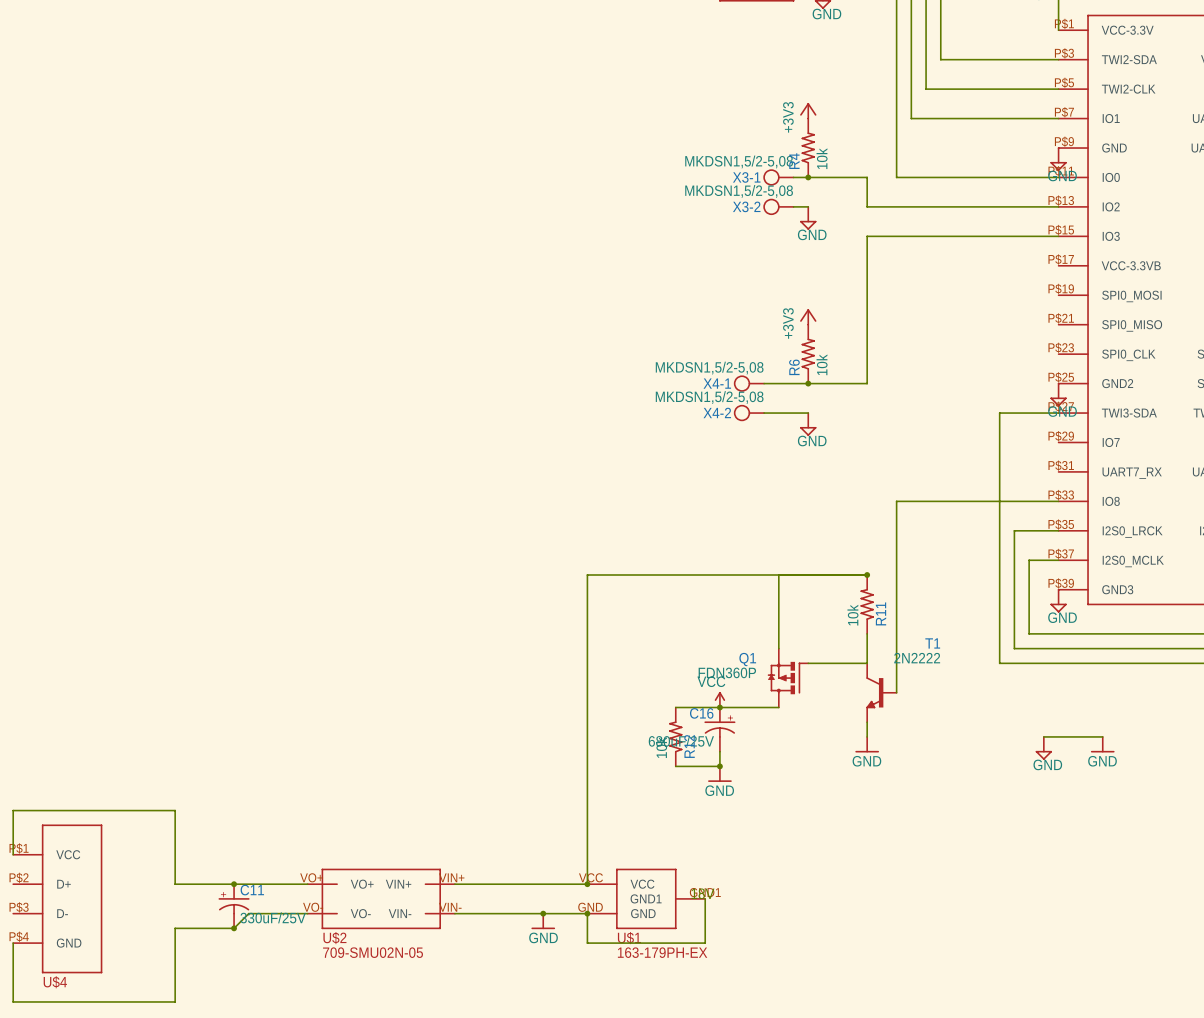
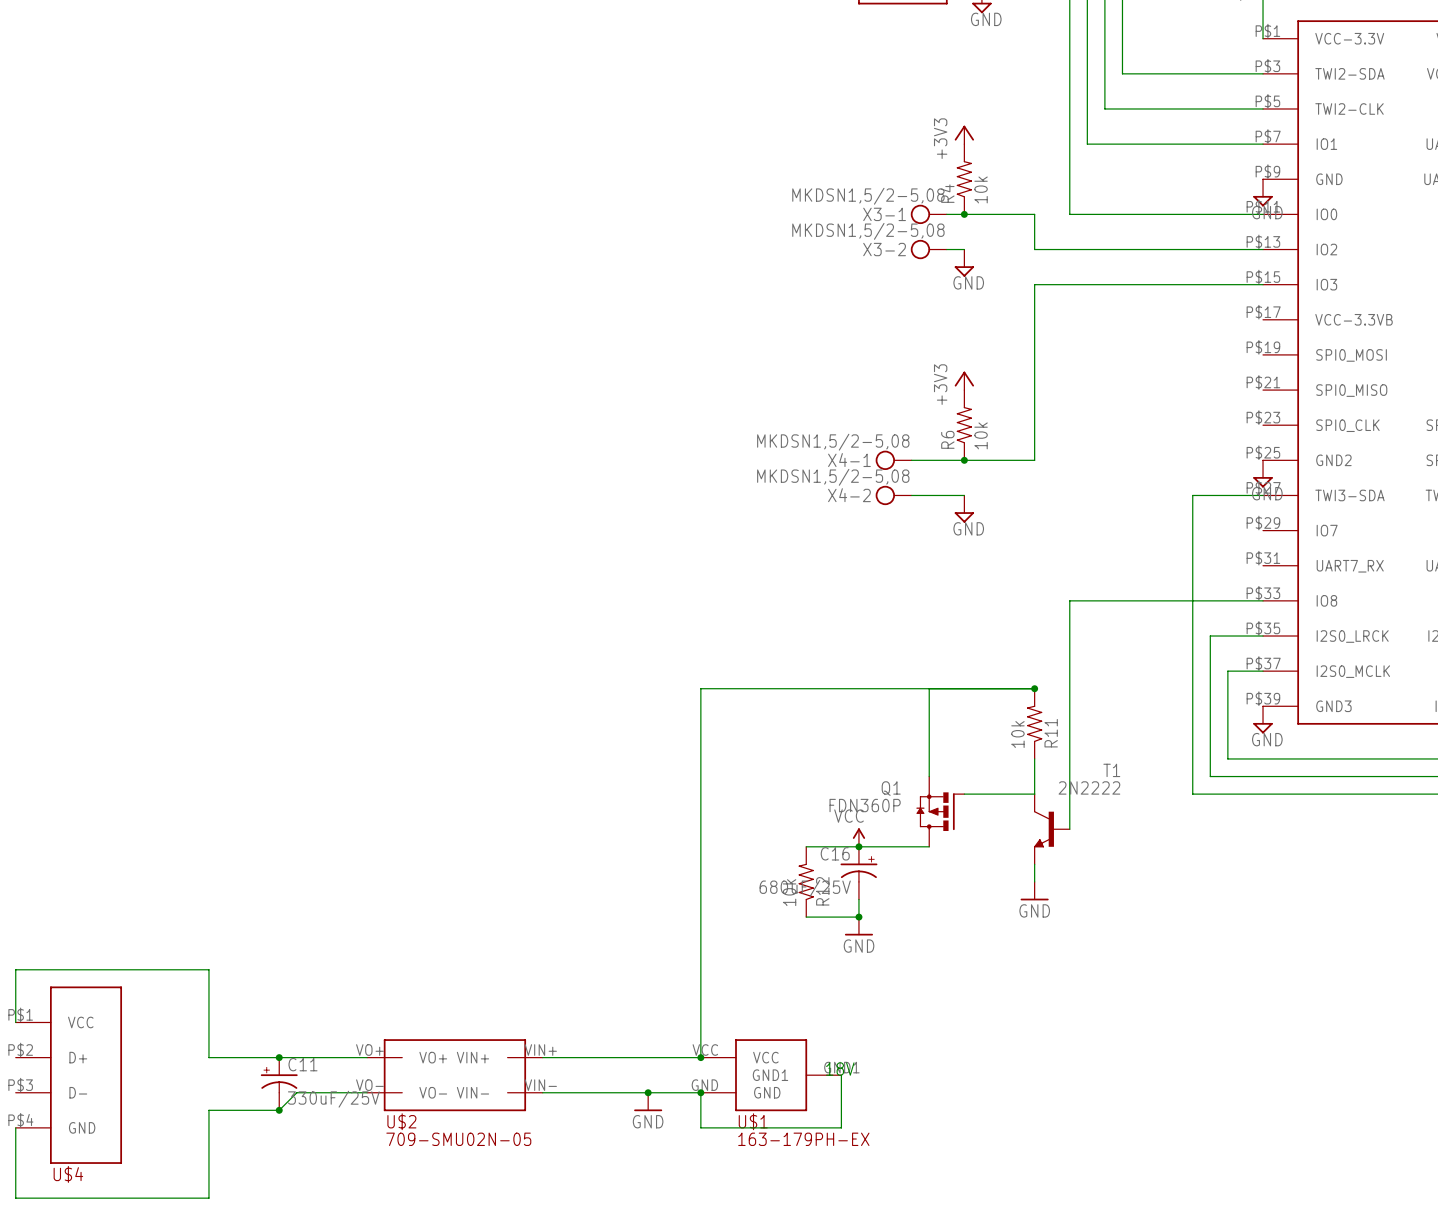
wire: (1043, 736) (1102, 736) -> none
power symbol: GND (1102, 744) -> none
power symbol: GND (1043, 748) -> none

